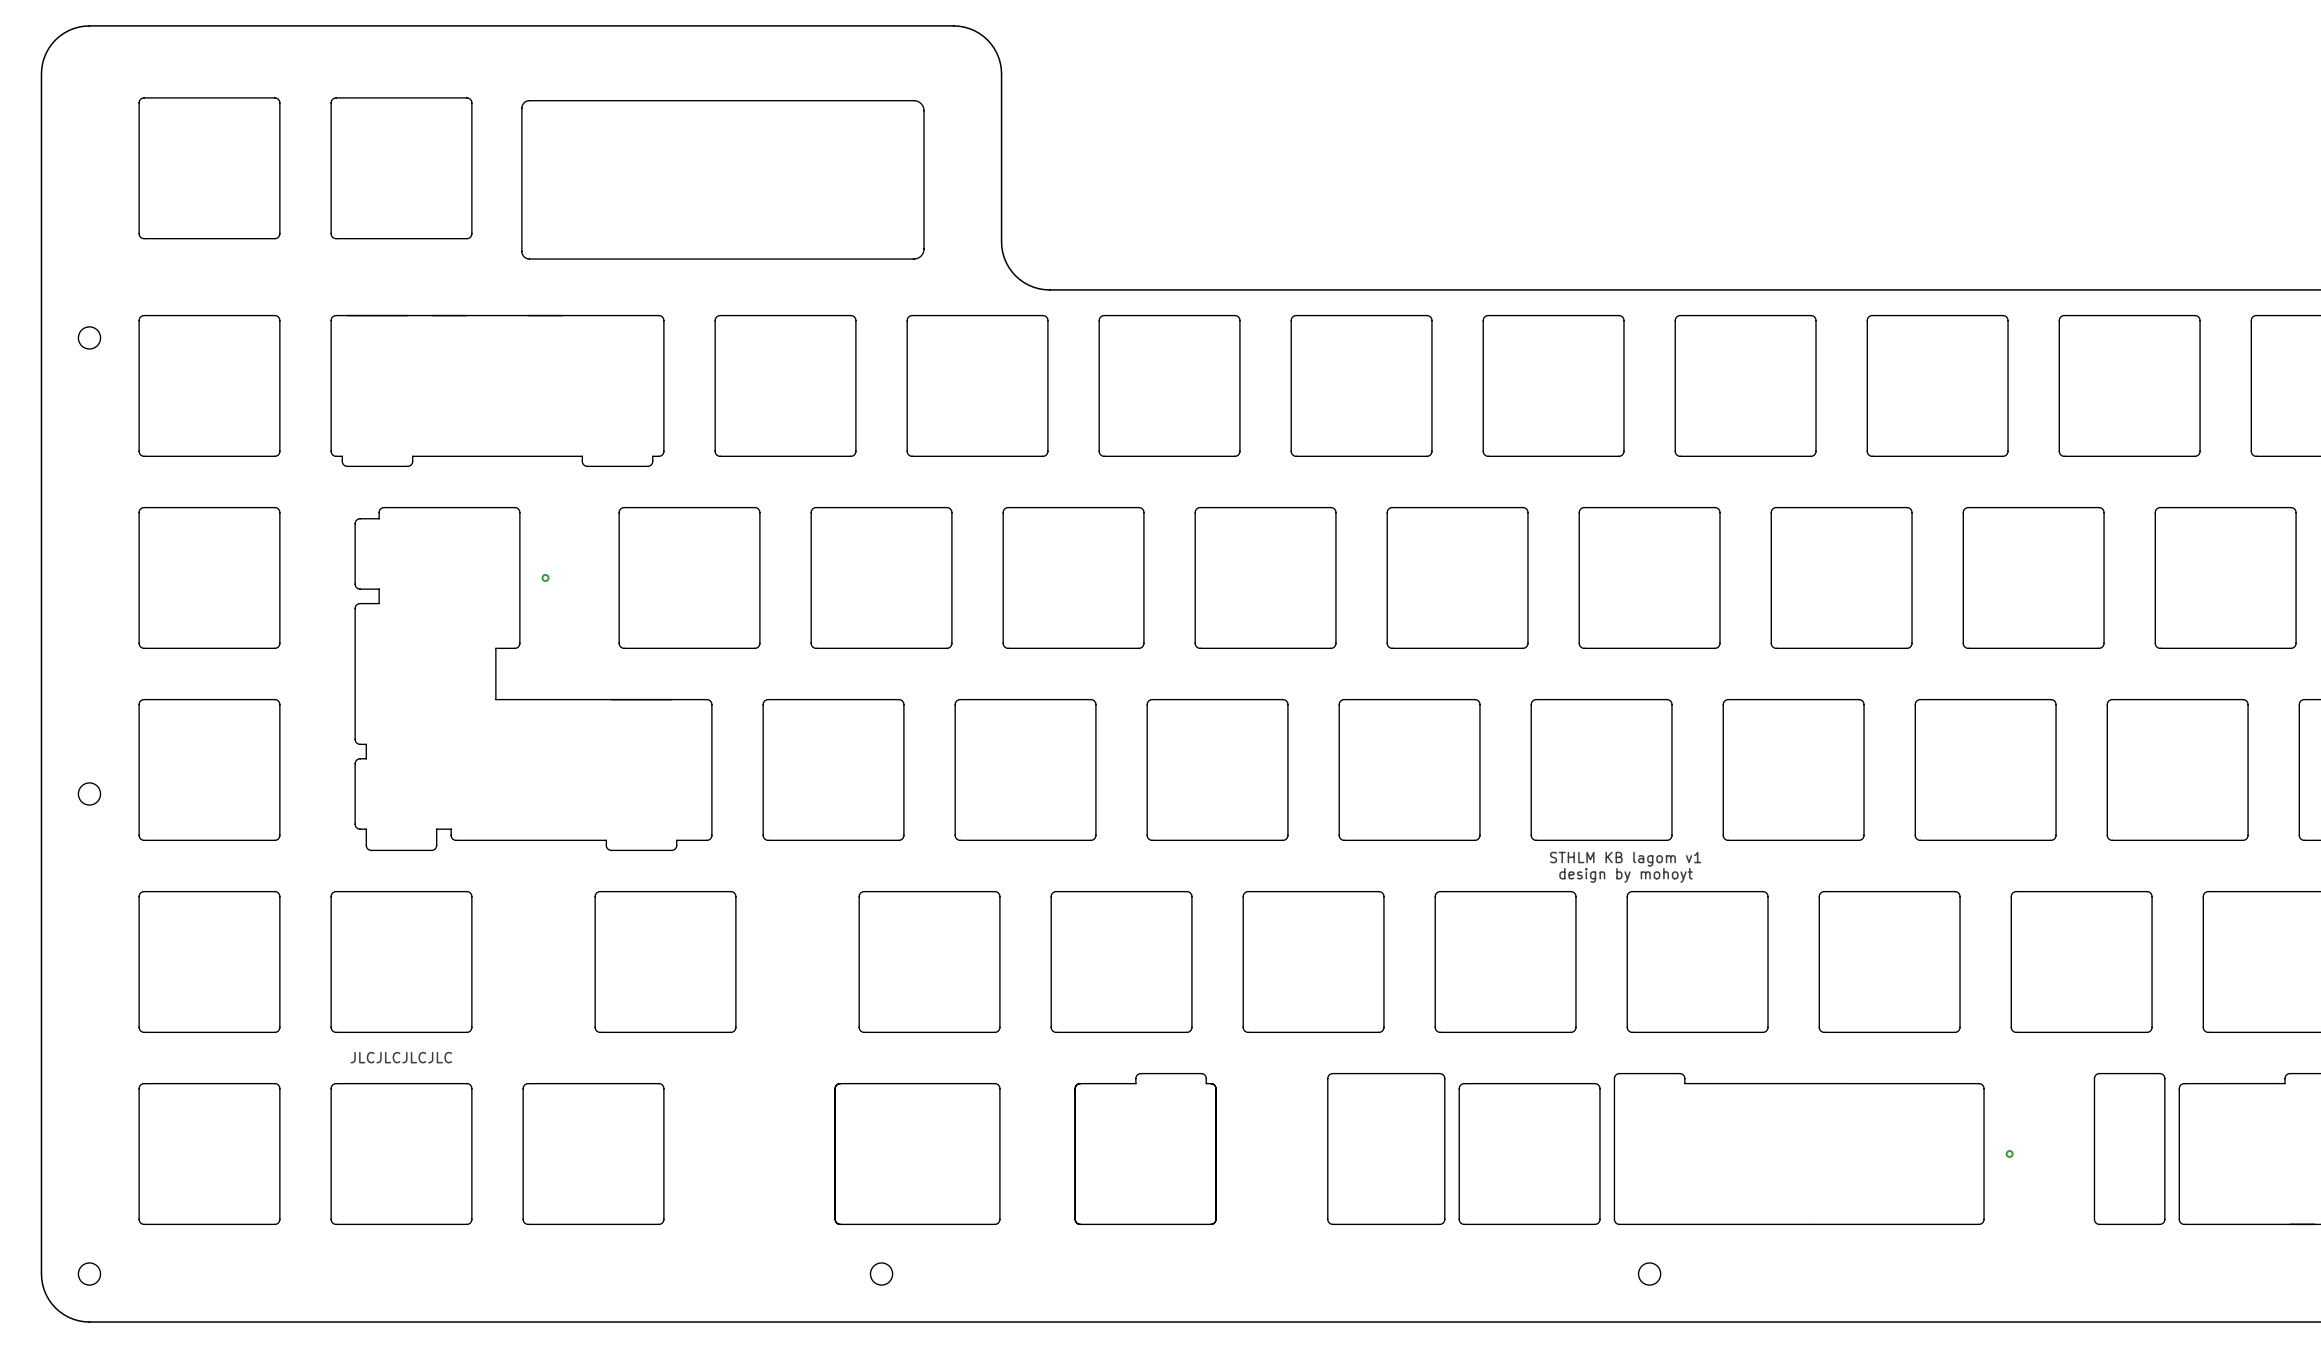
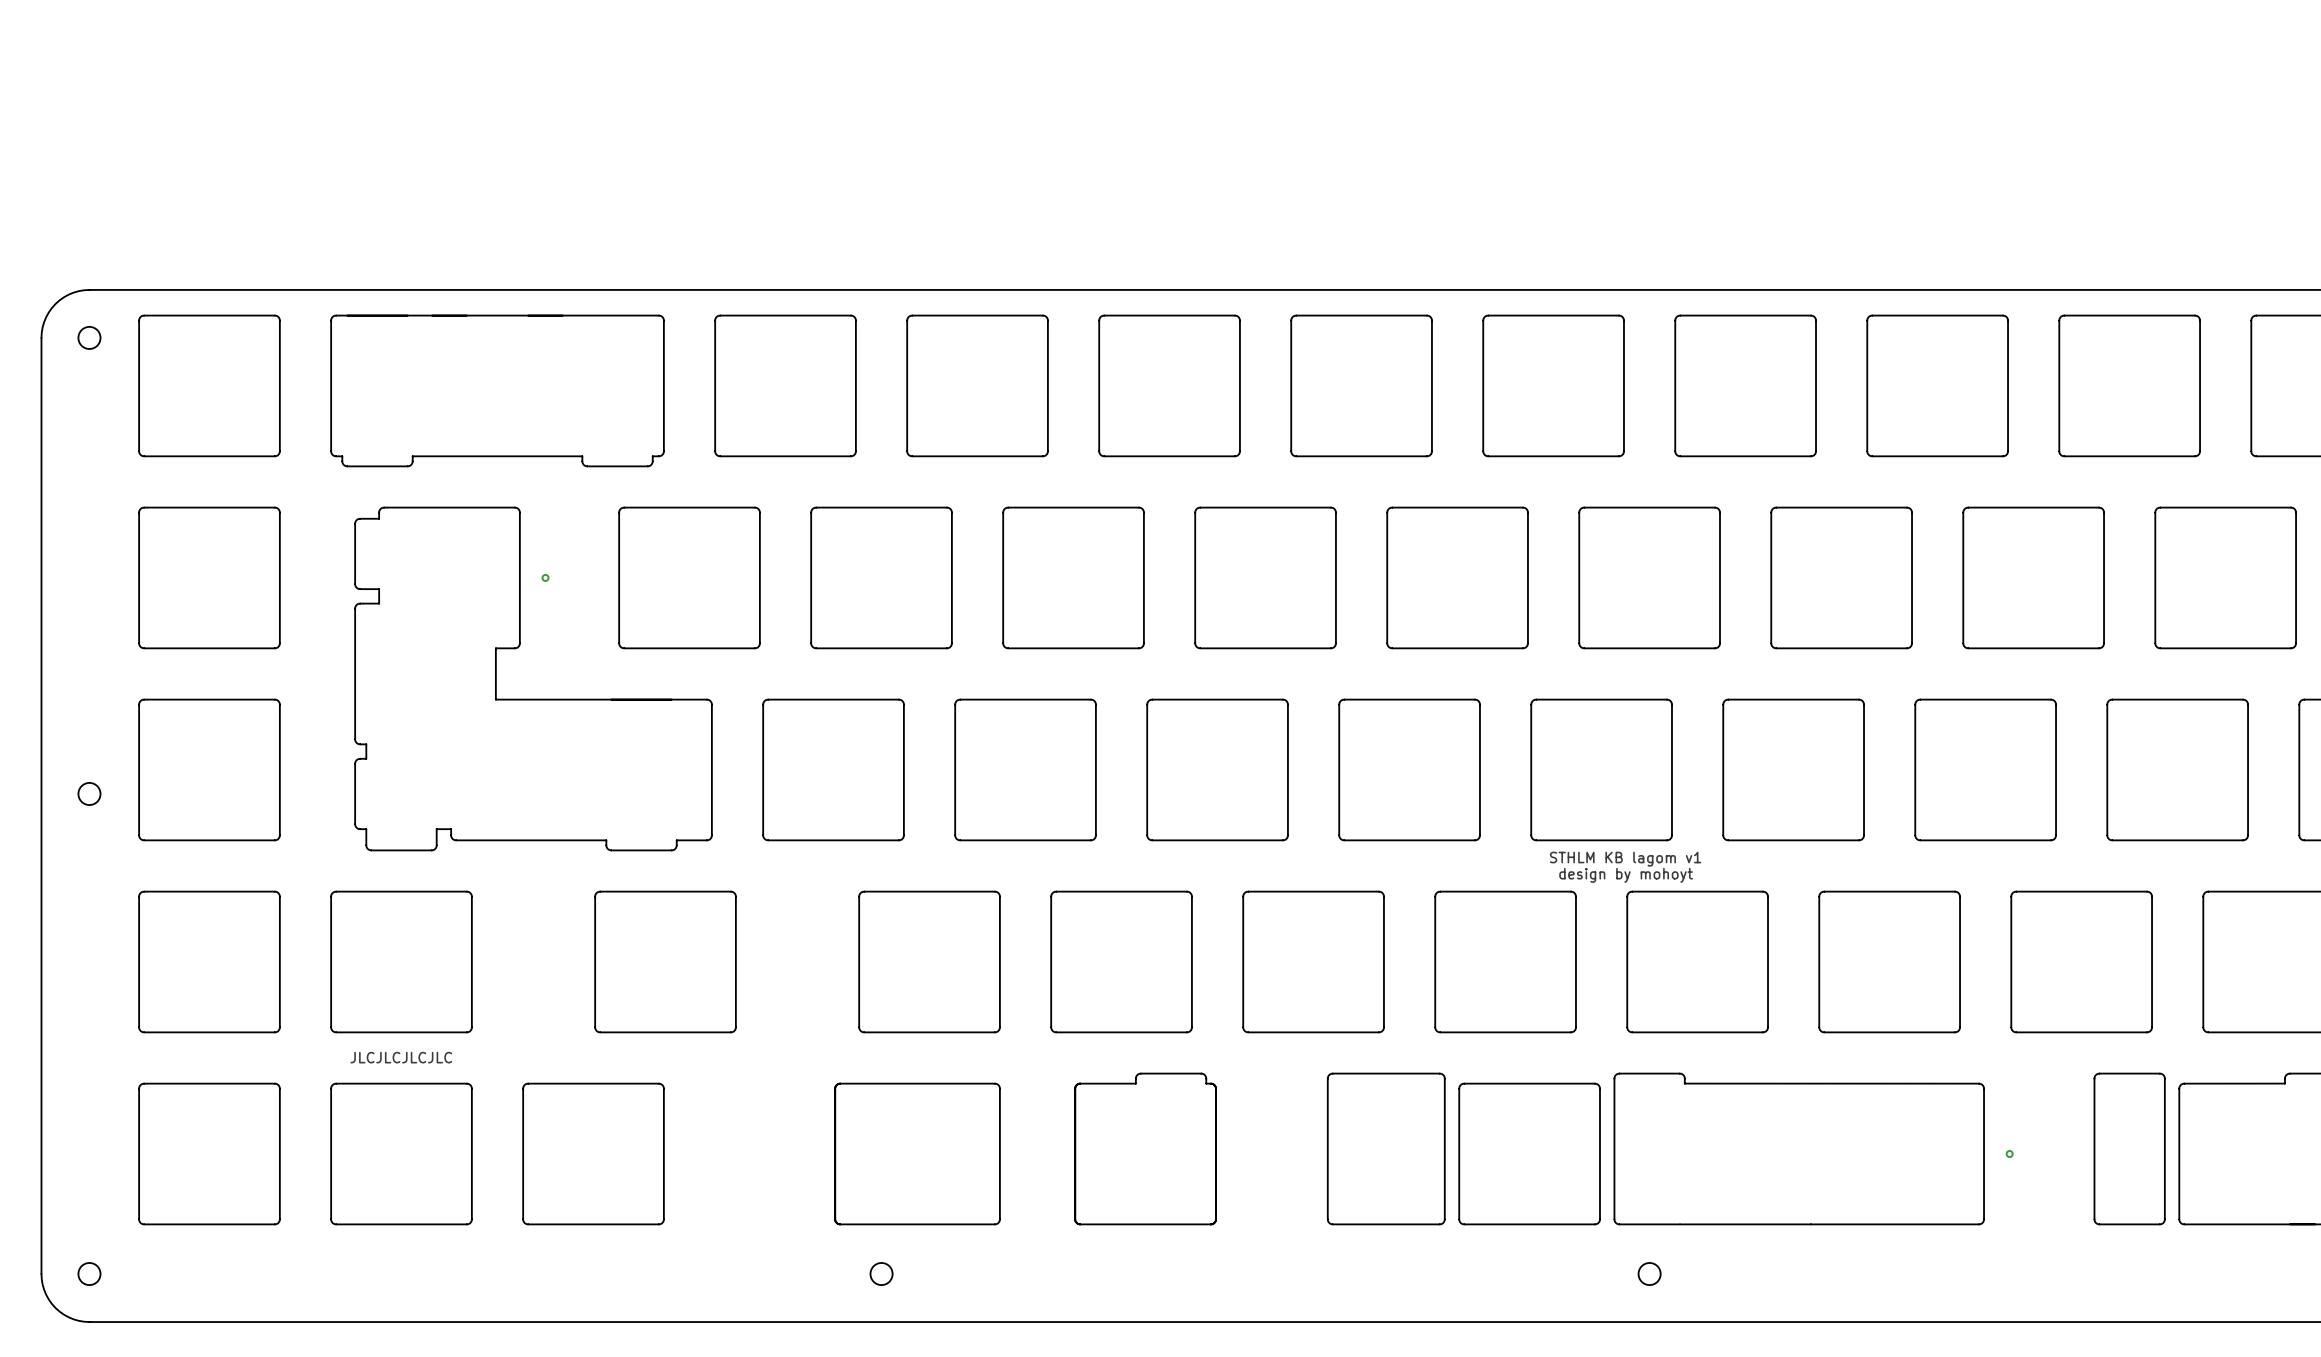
board edge: (274, 97) (140, 99) (140, 237) (278, 237) (279, 102) (274, 97) -> none
board edge: (466, 97) (332, 99) (332, 237) (470, 237) (471, 102) (466, 97) -> none
board edge: (913, 100) (526, 101) (521, 108) (522, 254) (529, 259) (917, 258) (921, 255) (924, 248) (924, 110) (921, 103) (913, 100) -> none
board edge: (1049, 289) (1038, 288) (1024, 282) (1012, 271) (1004, 257) (1001, 241) (1000, 63) (994, 48) (987, 39) (974, 30) (964, 27) (89, 25) (73, 28) (59, 36) (48, 48) (41, 68) (41, 337) -> (1049, 289) (89, 289) (73, 292) (55, 303) (46, 317) (41, 337)

